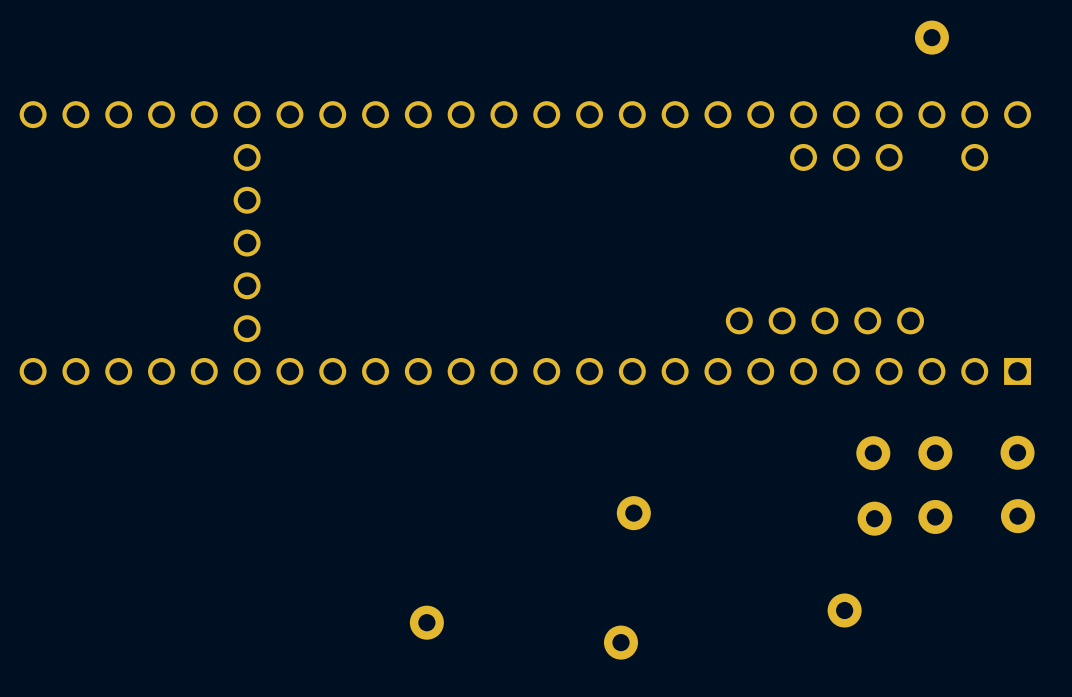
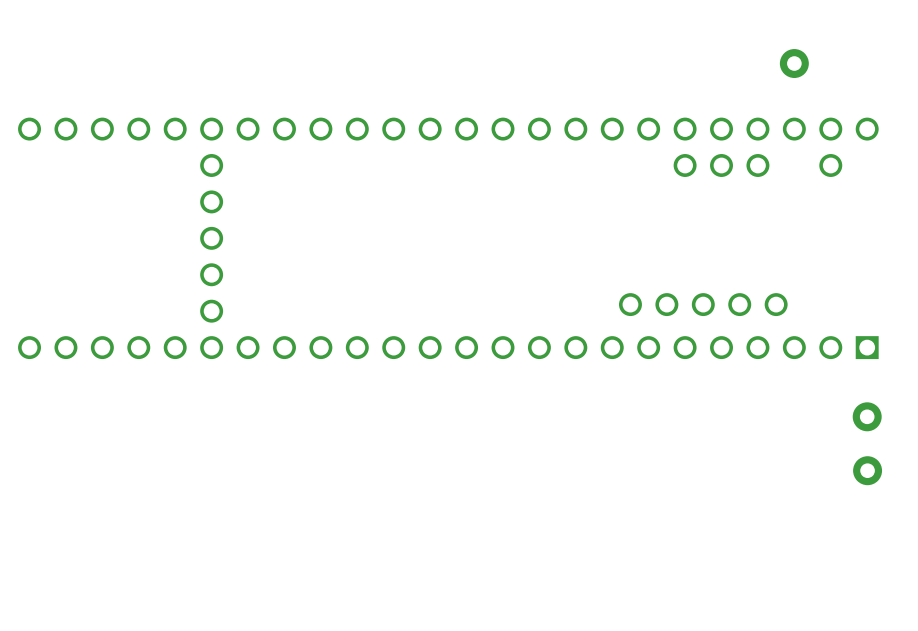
part: (873, 453) -> none
part: (935, 453) -> none
part: (633, 513) -> none
part: (935, 516) -> none
part: (874, 518) -> none
part: (844, 610) -> none
part: (426, 622) -> none
part: (620, 642) -> none

